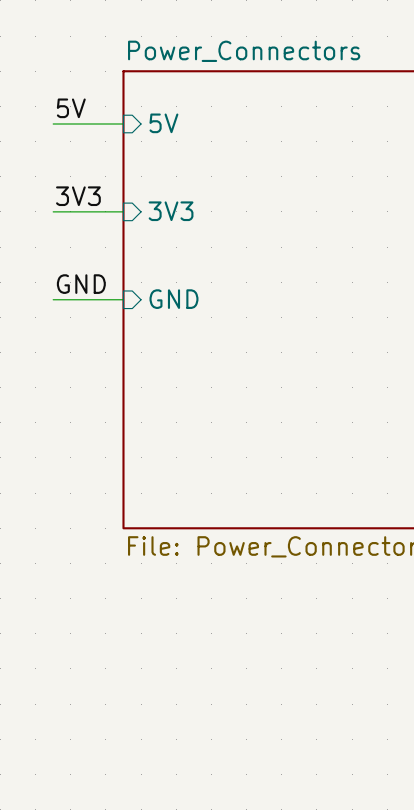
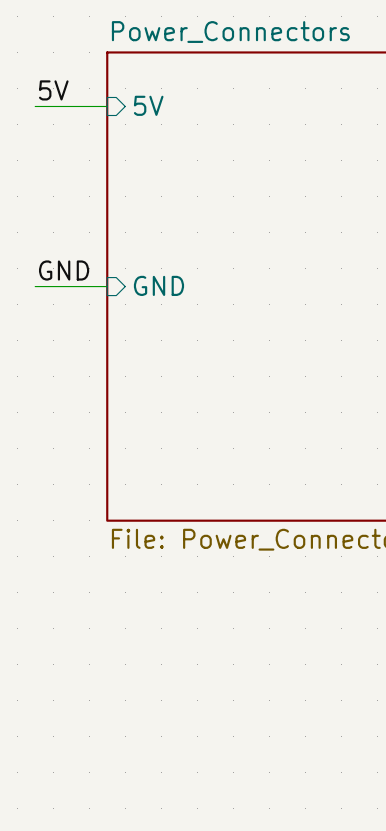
label: 3V3 (78, 196) -> none
wire: (53, 211) (123, 211) -> none
sheet pin: 3V3 (171, 211) -> none

